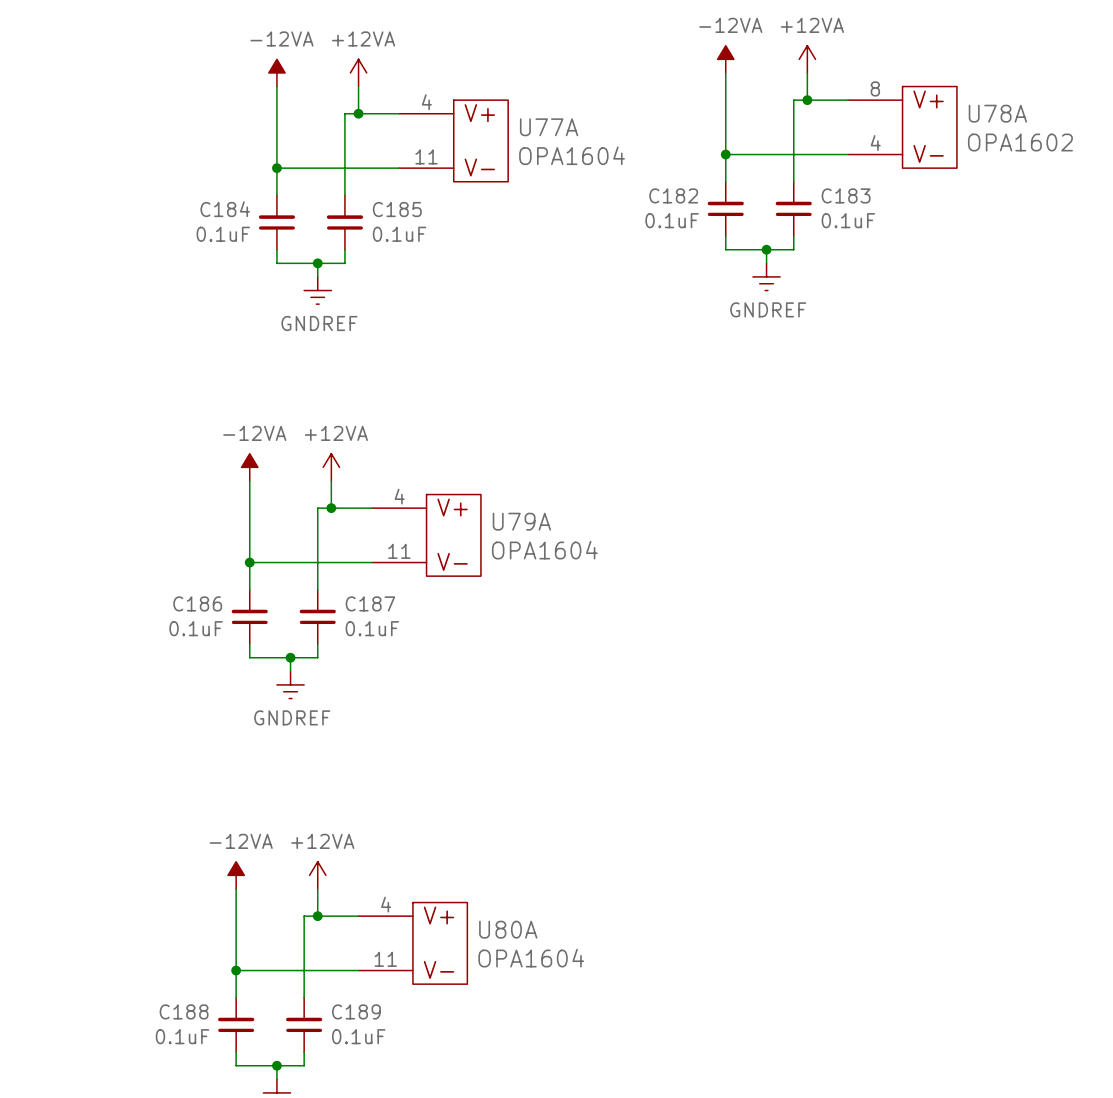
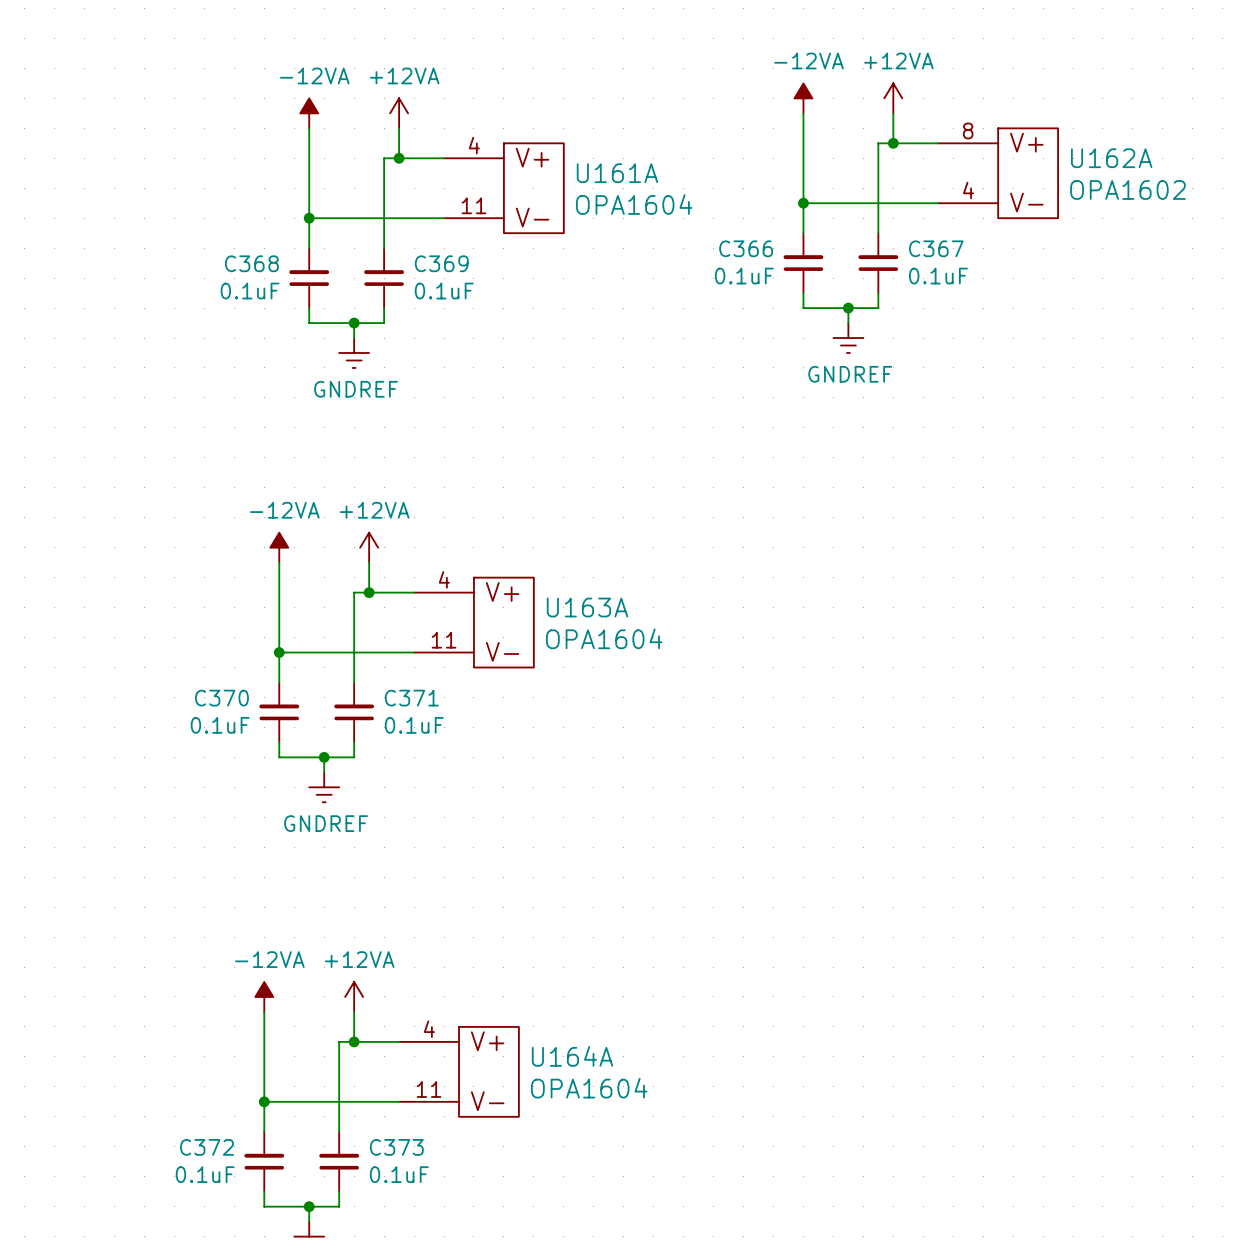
U78A name: U78A (997, 113) -> U162A (1111, 158)
U77A name: U77A (549, 127) -> U161A (617, 173)
C182 name: C182 (673, 195) -> C366 (746, 248)
C183 name: C183 (846, 195) -> C367 (936, 248)
C184 name: C184 (225, 209) -> C368 (251, 263)
C185 name: C185 (397, 209) -> C369 (441, 263)
U79A name: U79A (521, 521) -> U163A (587, 607)
C186 name: C186 (197, 603) -> C370 (221, 698)
C187 name: C187 (370, 603) -> C371 (411, 698)
U80A name: U80A (508, 929) -> U164A (572, 1056)
C188 name: C188 (184, 1011) -> C372 (206, 1147)
C189 name: C189 (356, 1011) -> C373 (396, 1147)

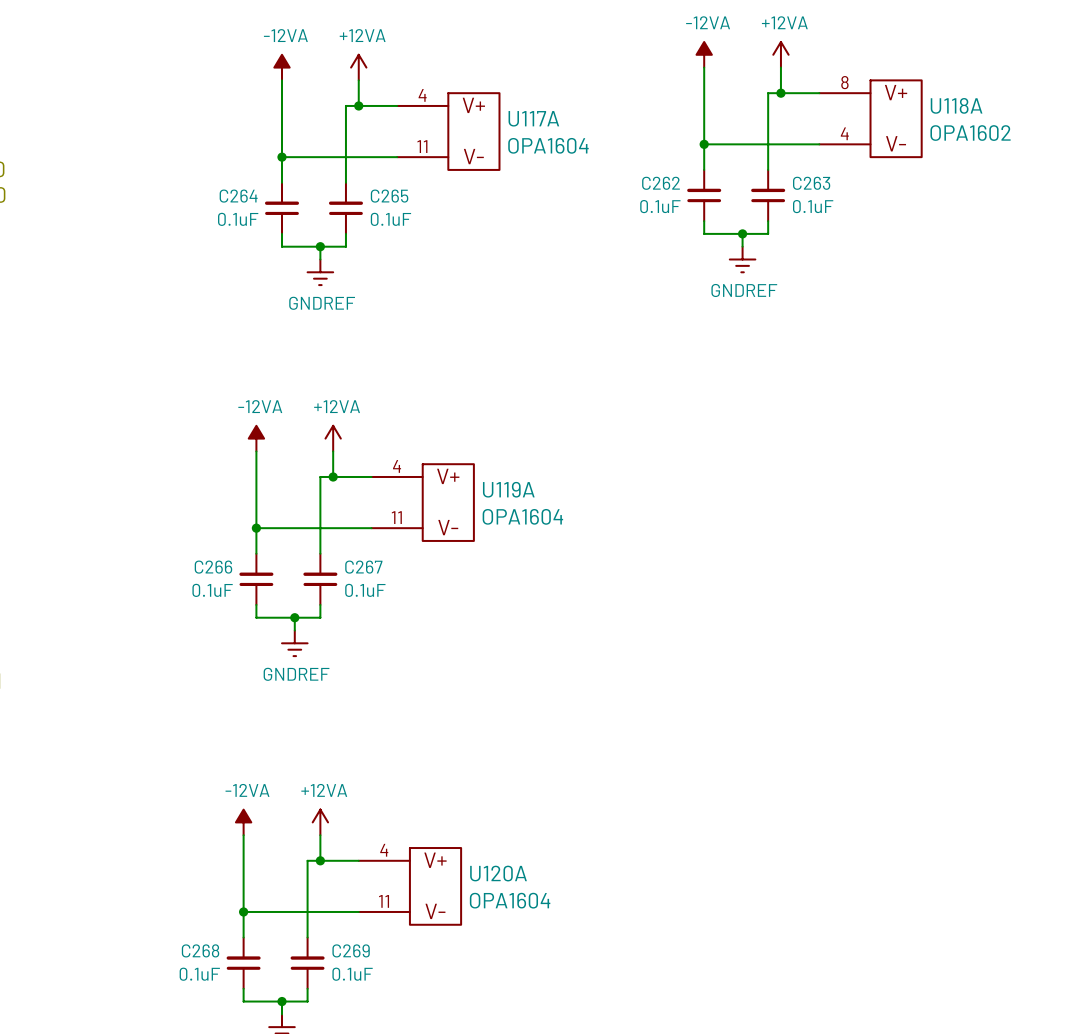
U162A name: U162A (1111, 158) -> U118A (956, 105)
U161A name: U161A (617, 173) -> U117A (533, 118)
C366 name: C366 (746, 248) -> C262 (660, 183)
C367 name: C367 (936, 248) -> C263 (811, 183)
C368 name: C368 (251, 263) -> C264 (238, 196)
C369 name: C369 (441, 263) -> C265 (389, 196)
U163A name: U163A (587, 607) -> U119A (508, 489)
C370 name: C370 (221, 698) -> C266 (213, 567)
C371 name: C371 (411, 698) -> C267 (363, 567)
U164A name: U164A (572, 1056) -> U120A (498, 873)
C372 name: C372 (206, 1147) -> C268 (200, 950)
C373 name: C373 (396, 1147) -> C269 (351, 950)

